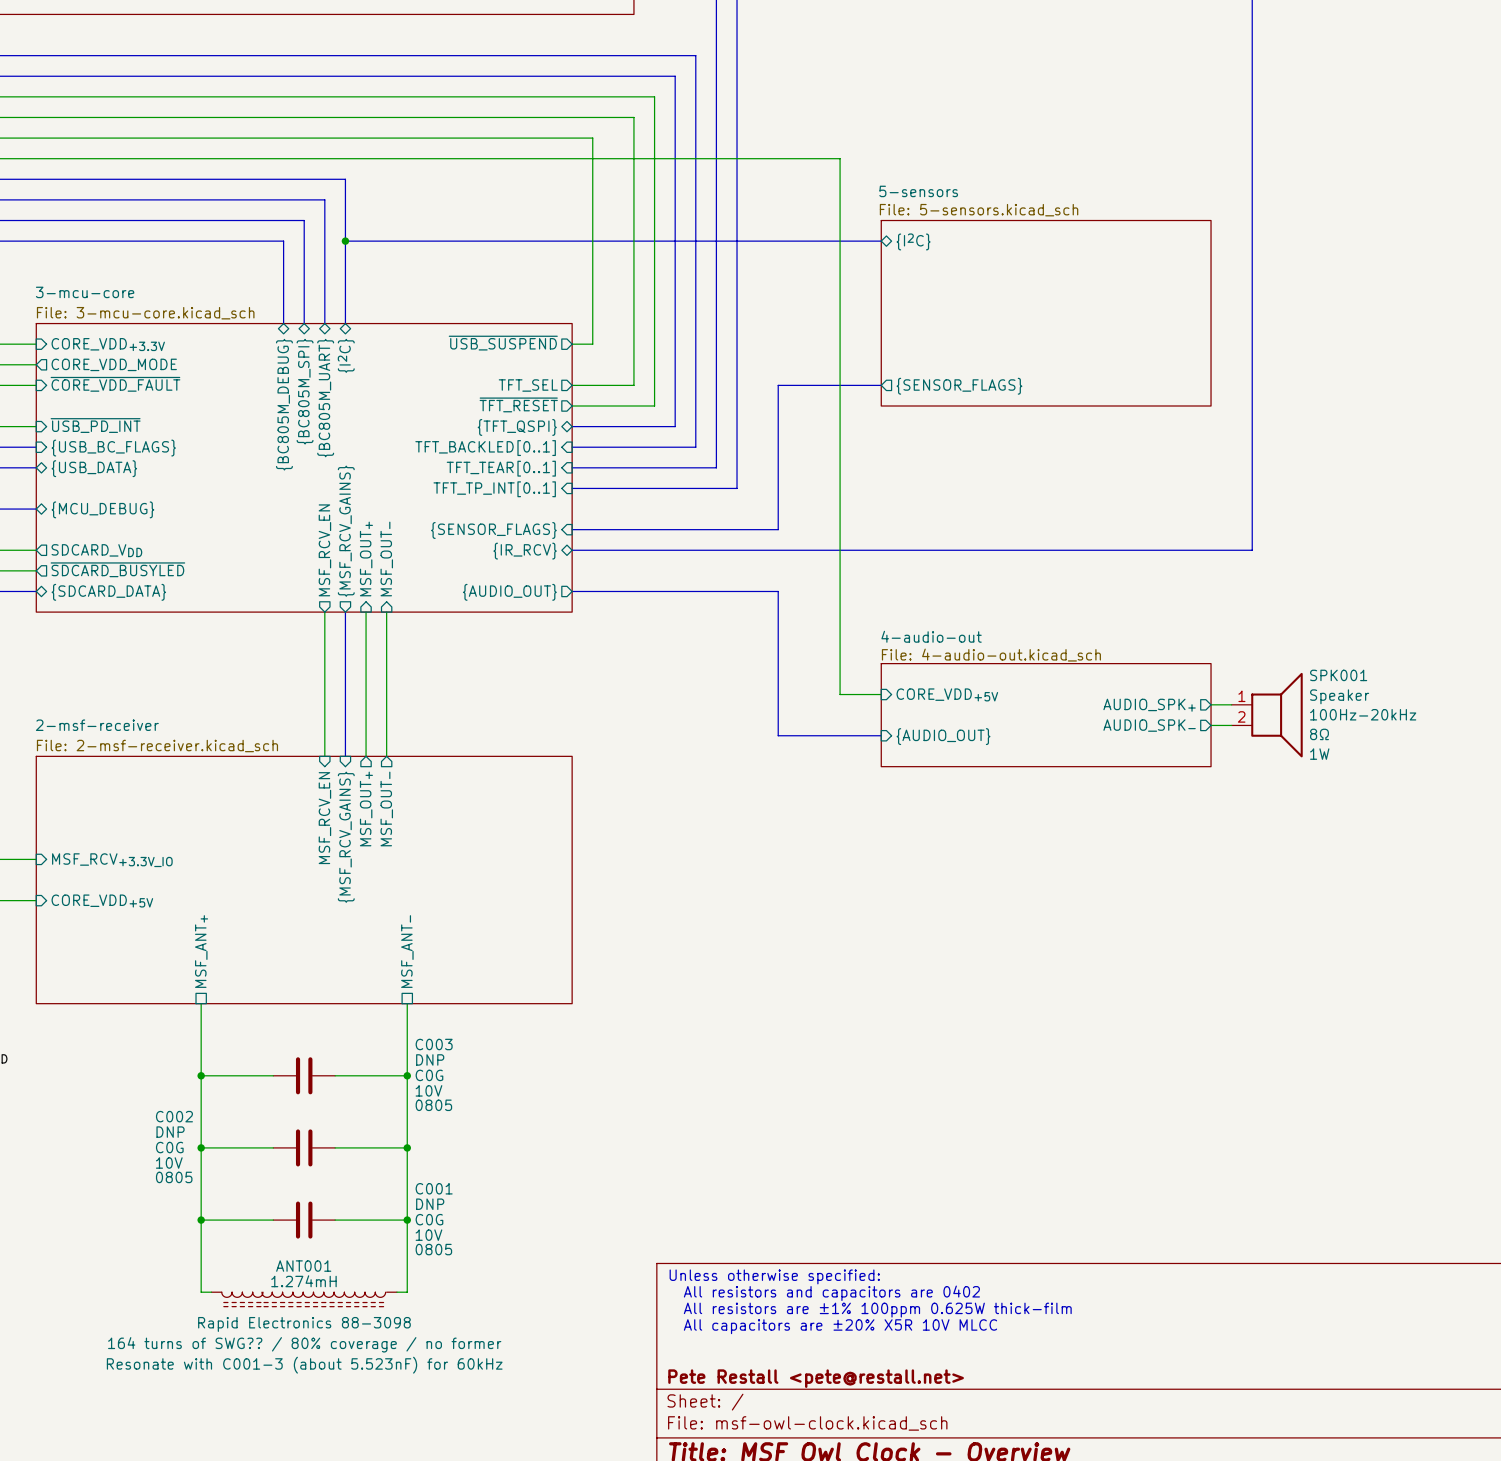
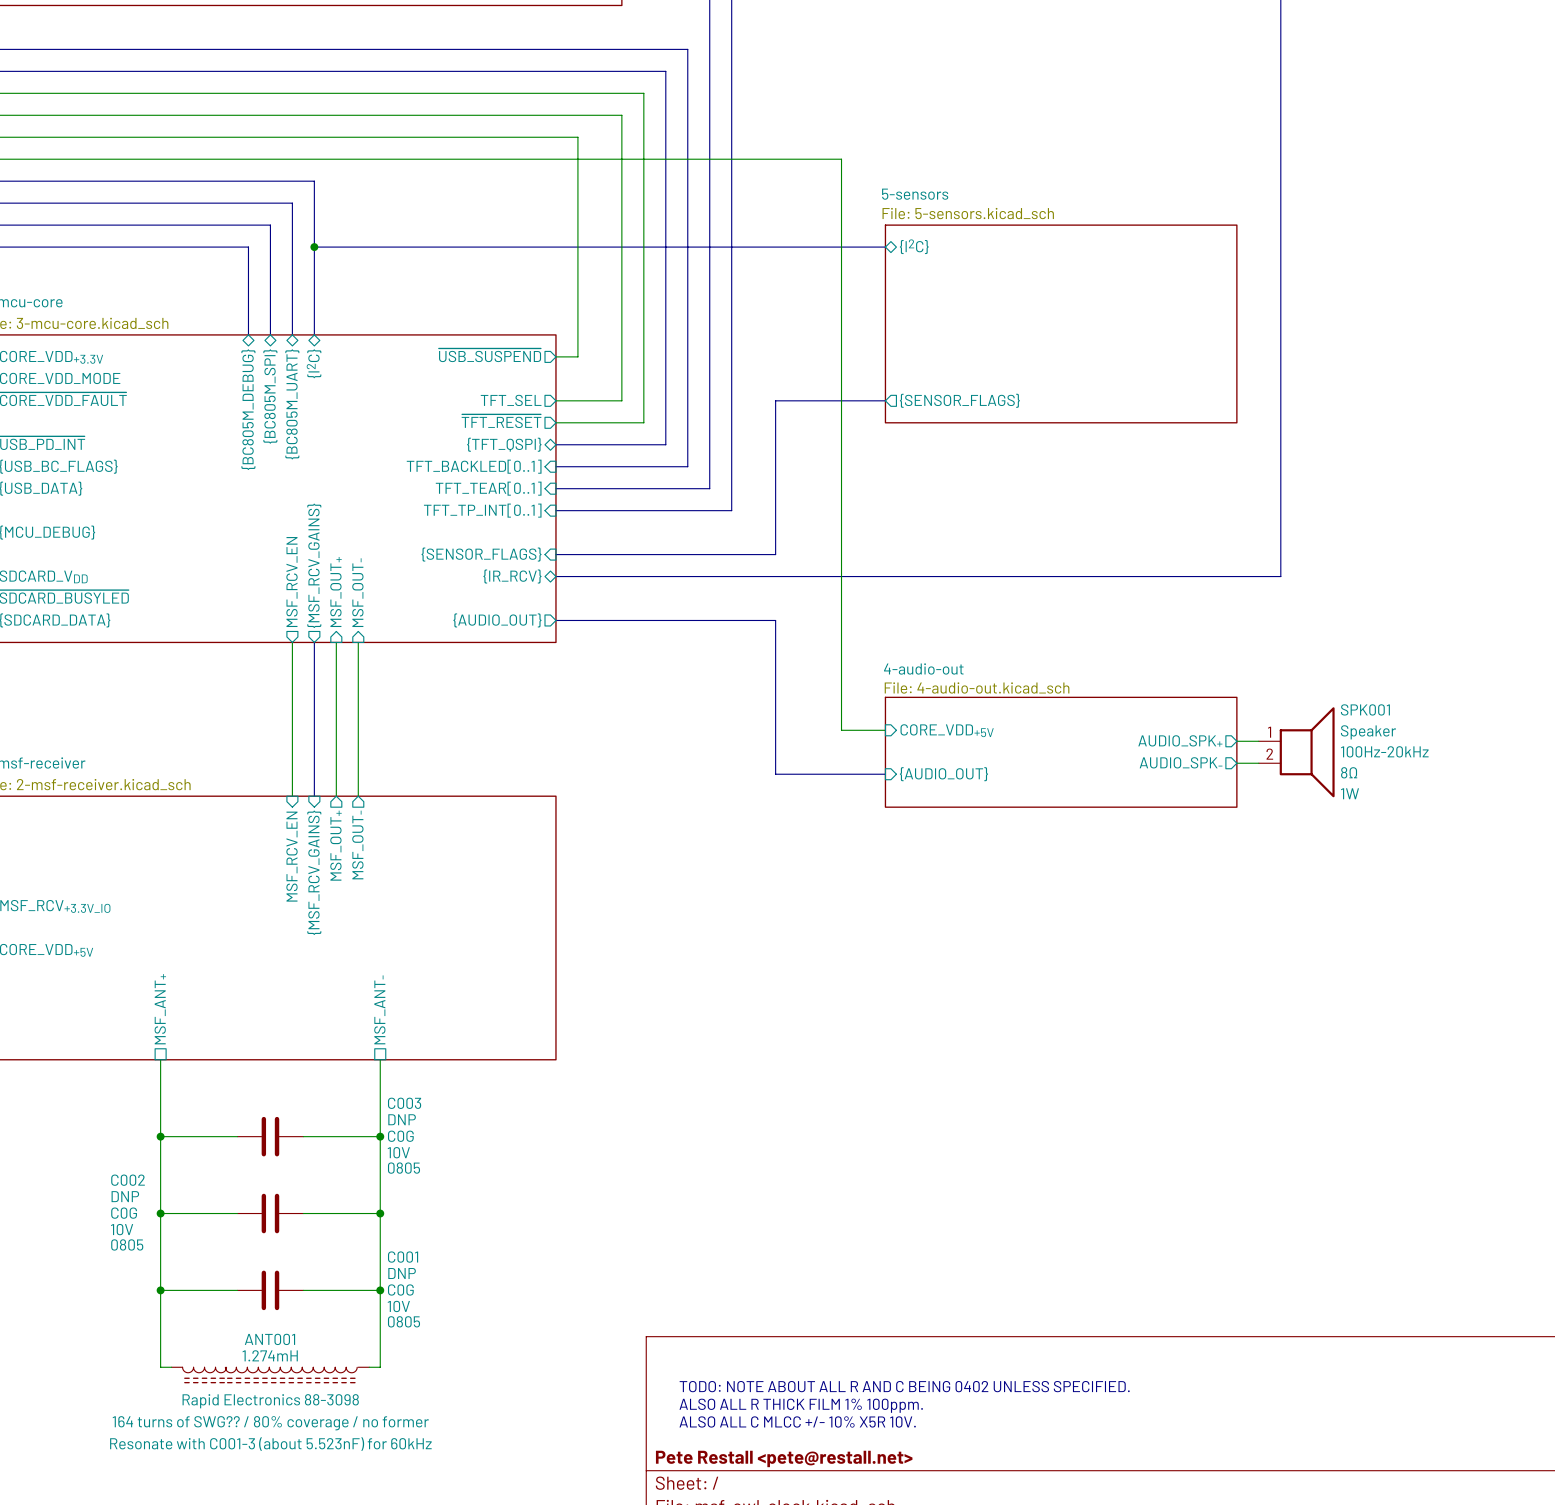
text: Unless otherwise specified: (774, 1276) -> none
text: All resistors and capacitors are 0402 (831, 1293) -> none
text: All resistors are ±1% 100ppm 0.625W thick-film (877, 1310) -> none
text: none -> TODO: NOTE ABOUT ALL R AND C BEING 0402 UNLESS SPECIFIED. (904, 1386)
text: All capacitors are ±20% X5R 10V MLCC (840, 1326) -> none
text: none -> ALSO ALL R THICK FILM 1% 100ppm. (801, 1405)
text: none -> ALSO ALL C MLCC +/- 10% X5R 10V. (797, 1421)

